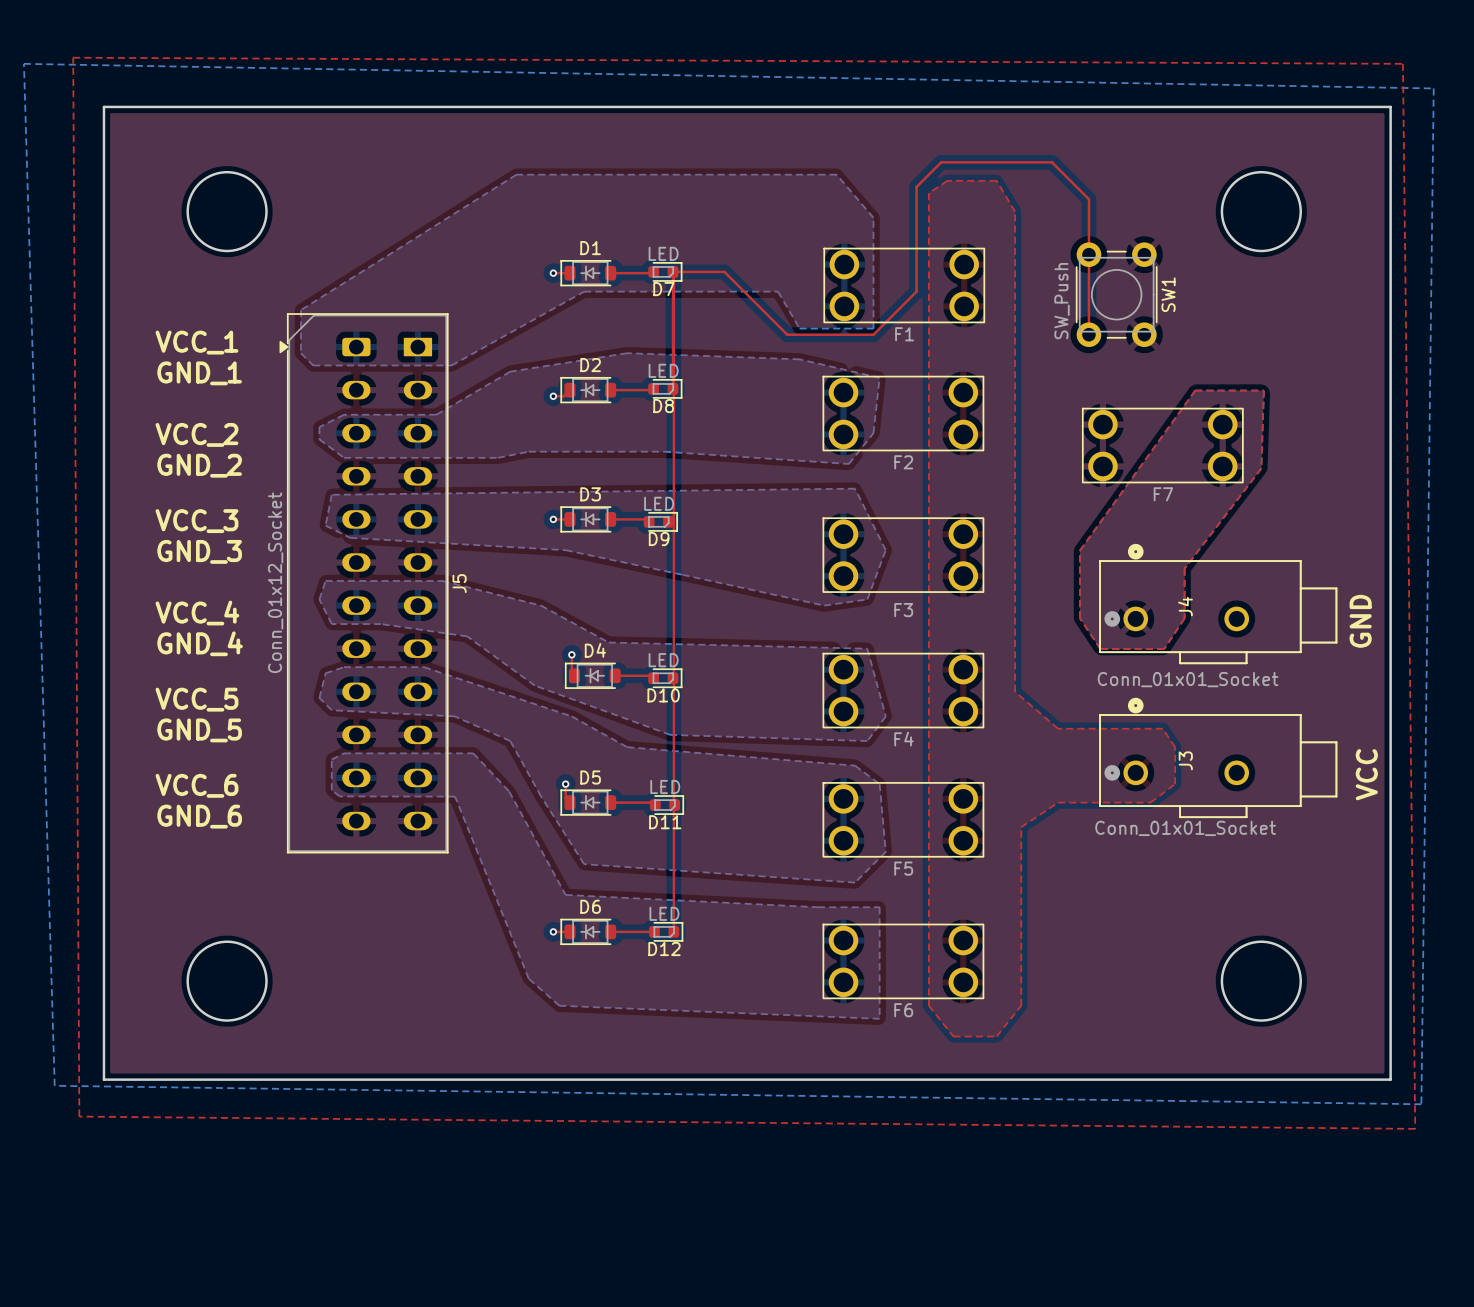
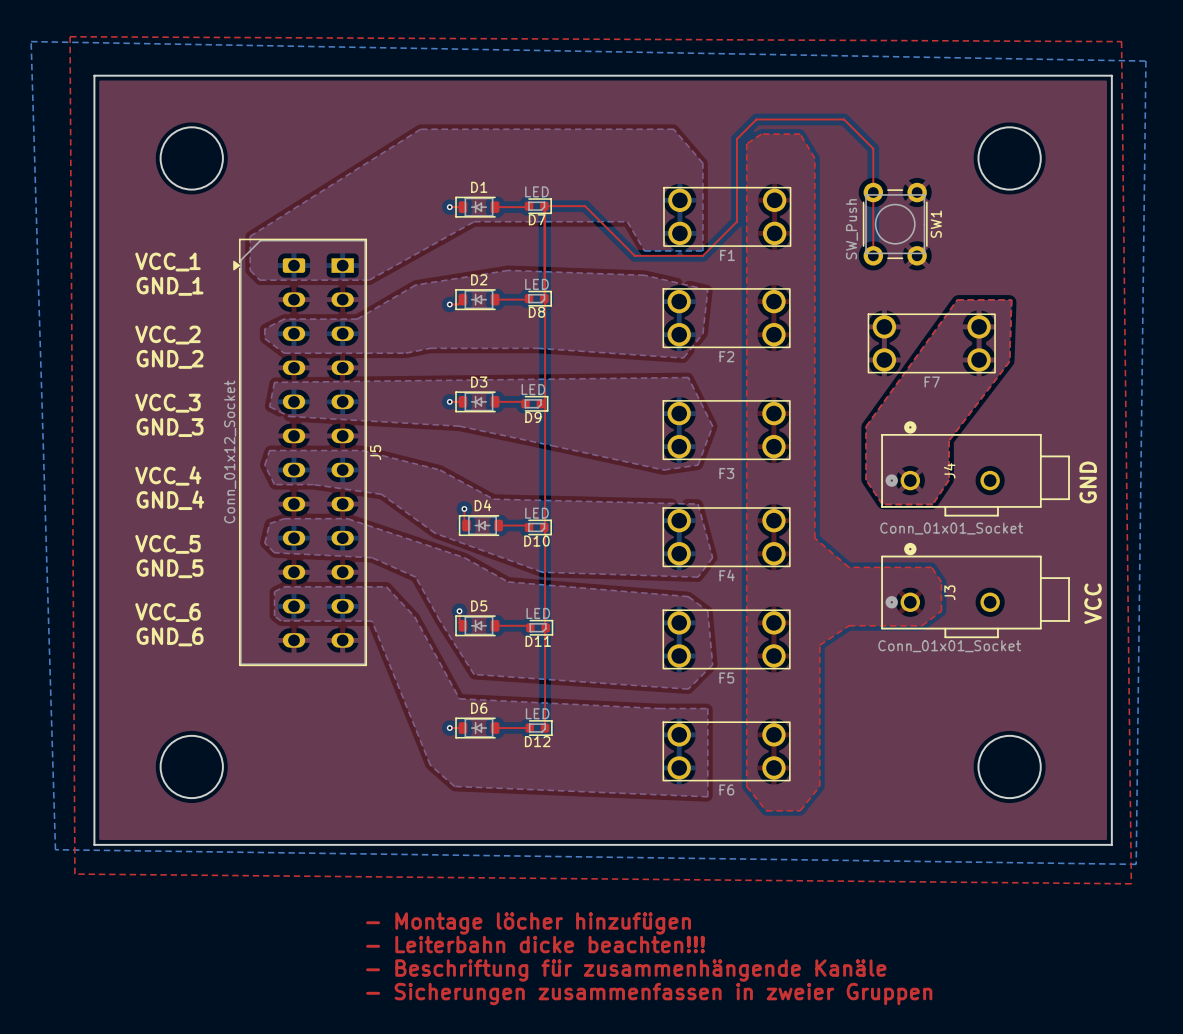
text: none -> - Montage löcher hinzufügen (528, 923)
text: none -> - Leiterbahn dicke beachten!!! (535, 944)
text: none -> - Beschriftung für zusammenhängende Kanäle (626, 970)
text: none -> - Sicherungen zusammenfassen in zweier Gruppen (649, 993)

